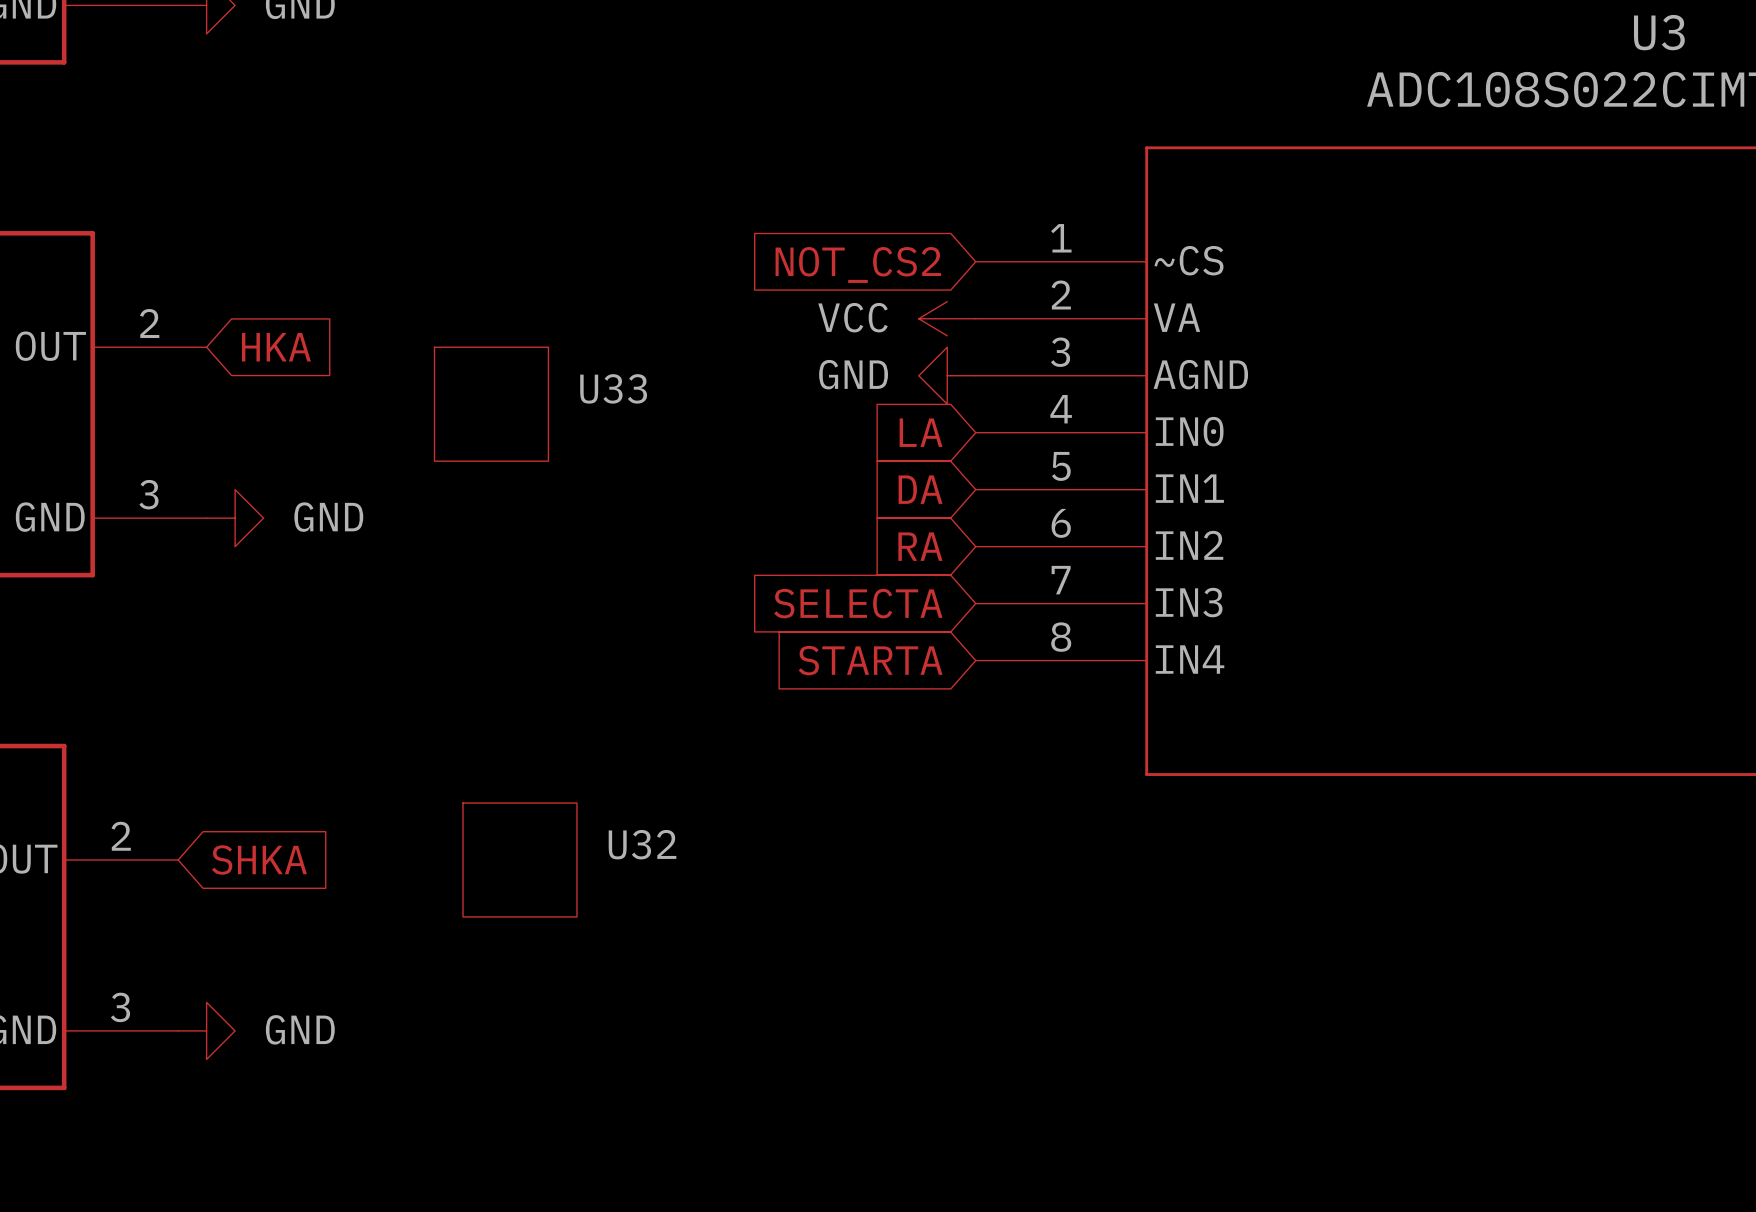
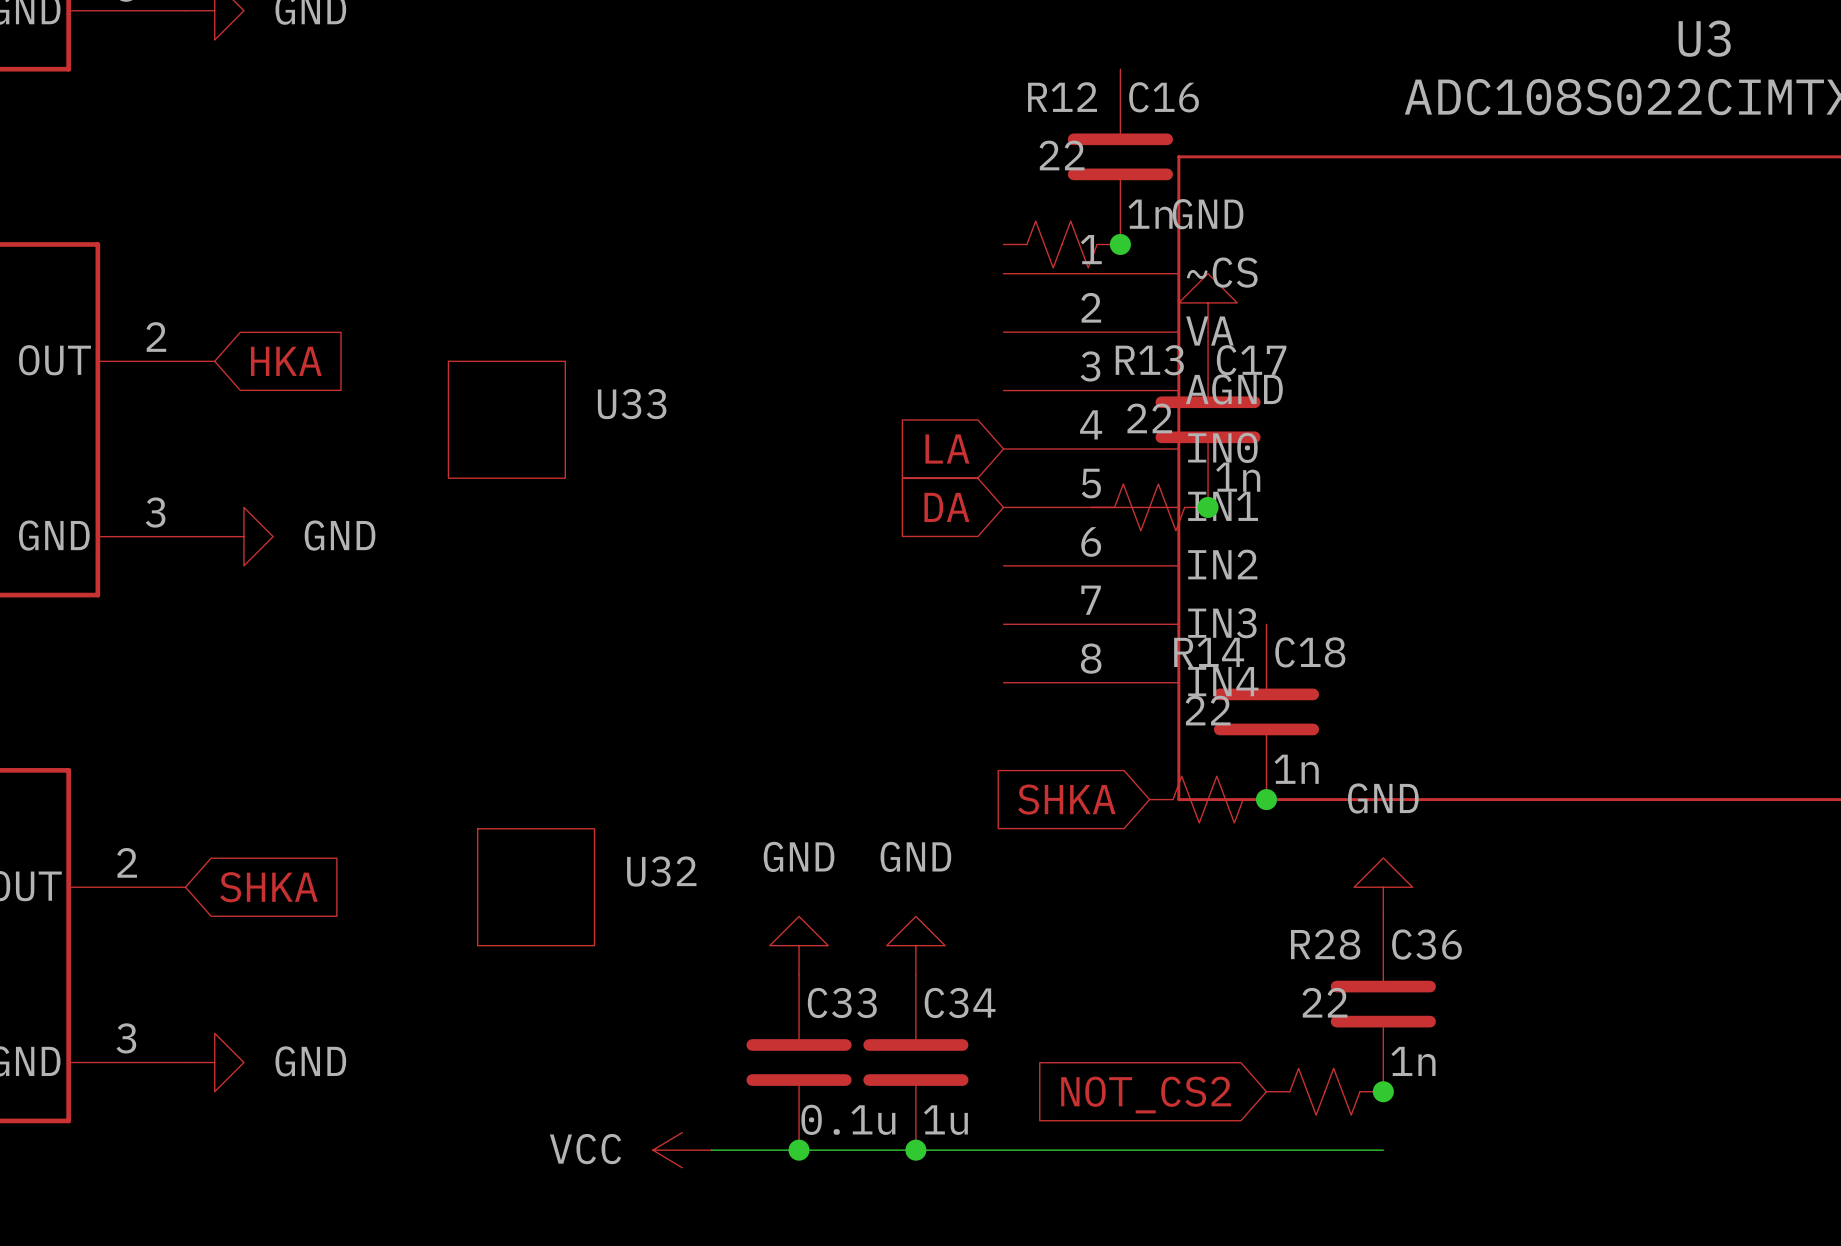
C16: none -> 1n (1120, 156)
R12: none -> 22 (1061, 244)
junction: none -> (1120, 244)
global label: NOT_CS2 (858, 264) -> none
power symbol: VCC (947, 318) -> none
power symbol rotation: 0° (947, 375) -> 90° clockwise (1208, 302)
power symbol position: GND (947, 375) -> GND (1208, 302)
C17: none -> 1n (1208, 419)
R13: none -> 22 (1149, 507)
junction: none -> (1208, 507)
global label: RA (920, 546) -> none
global label: SELECTA (858, 603) -> none
global label: STARTA (870, 660) -> none
C18: none -> 1n (1266, 711)
global label: none -> SHKA (1066, 799)
R14: none -> 22 (1208, 799)
junction: none -> (1266, 799)
power symbol: none -> GND (1383, 887)
power symbol: none -> GND (799, 945)
power symbol: none -> GND (915, 945)
C36: none -> 1n (1383, 1004)
C33: none -> 0.1u (799, 1062)
C34: none -> 1u (915, 1062)
R28: none -> 22 (1324, 1091)
junction: none -> (1383, 1091)
global label: none -> NOT_CS2 (1146, 1095)
power symbol: none -> VCC (682, 1150)
wire: none -> (711, 1150) (1383, 1150)
junction: none -> (799, 1150)
junction: none -> (915, 1150)

